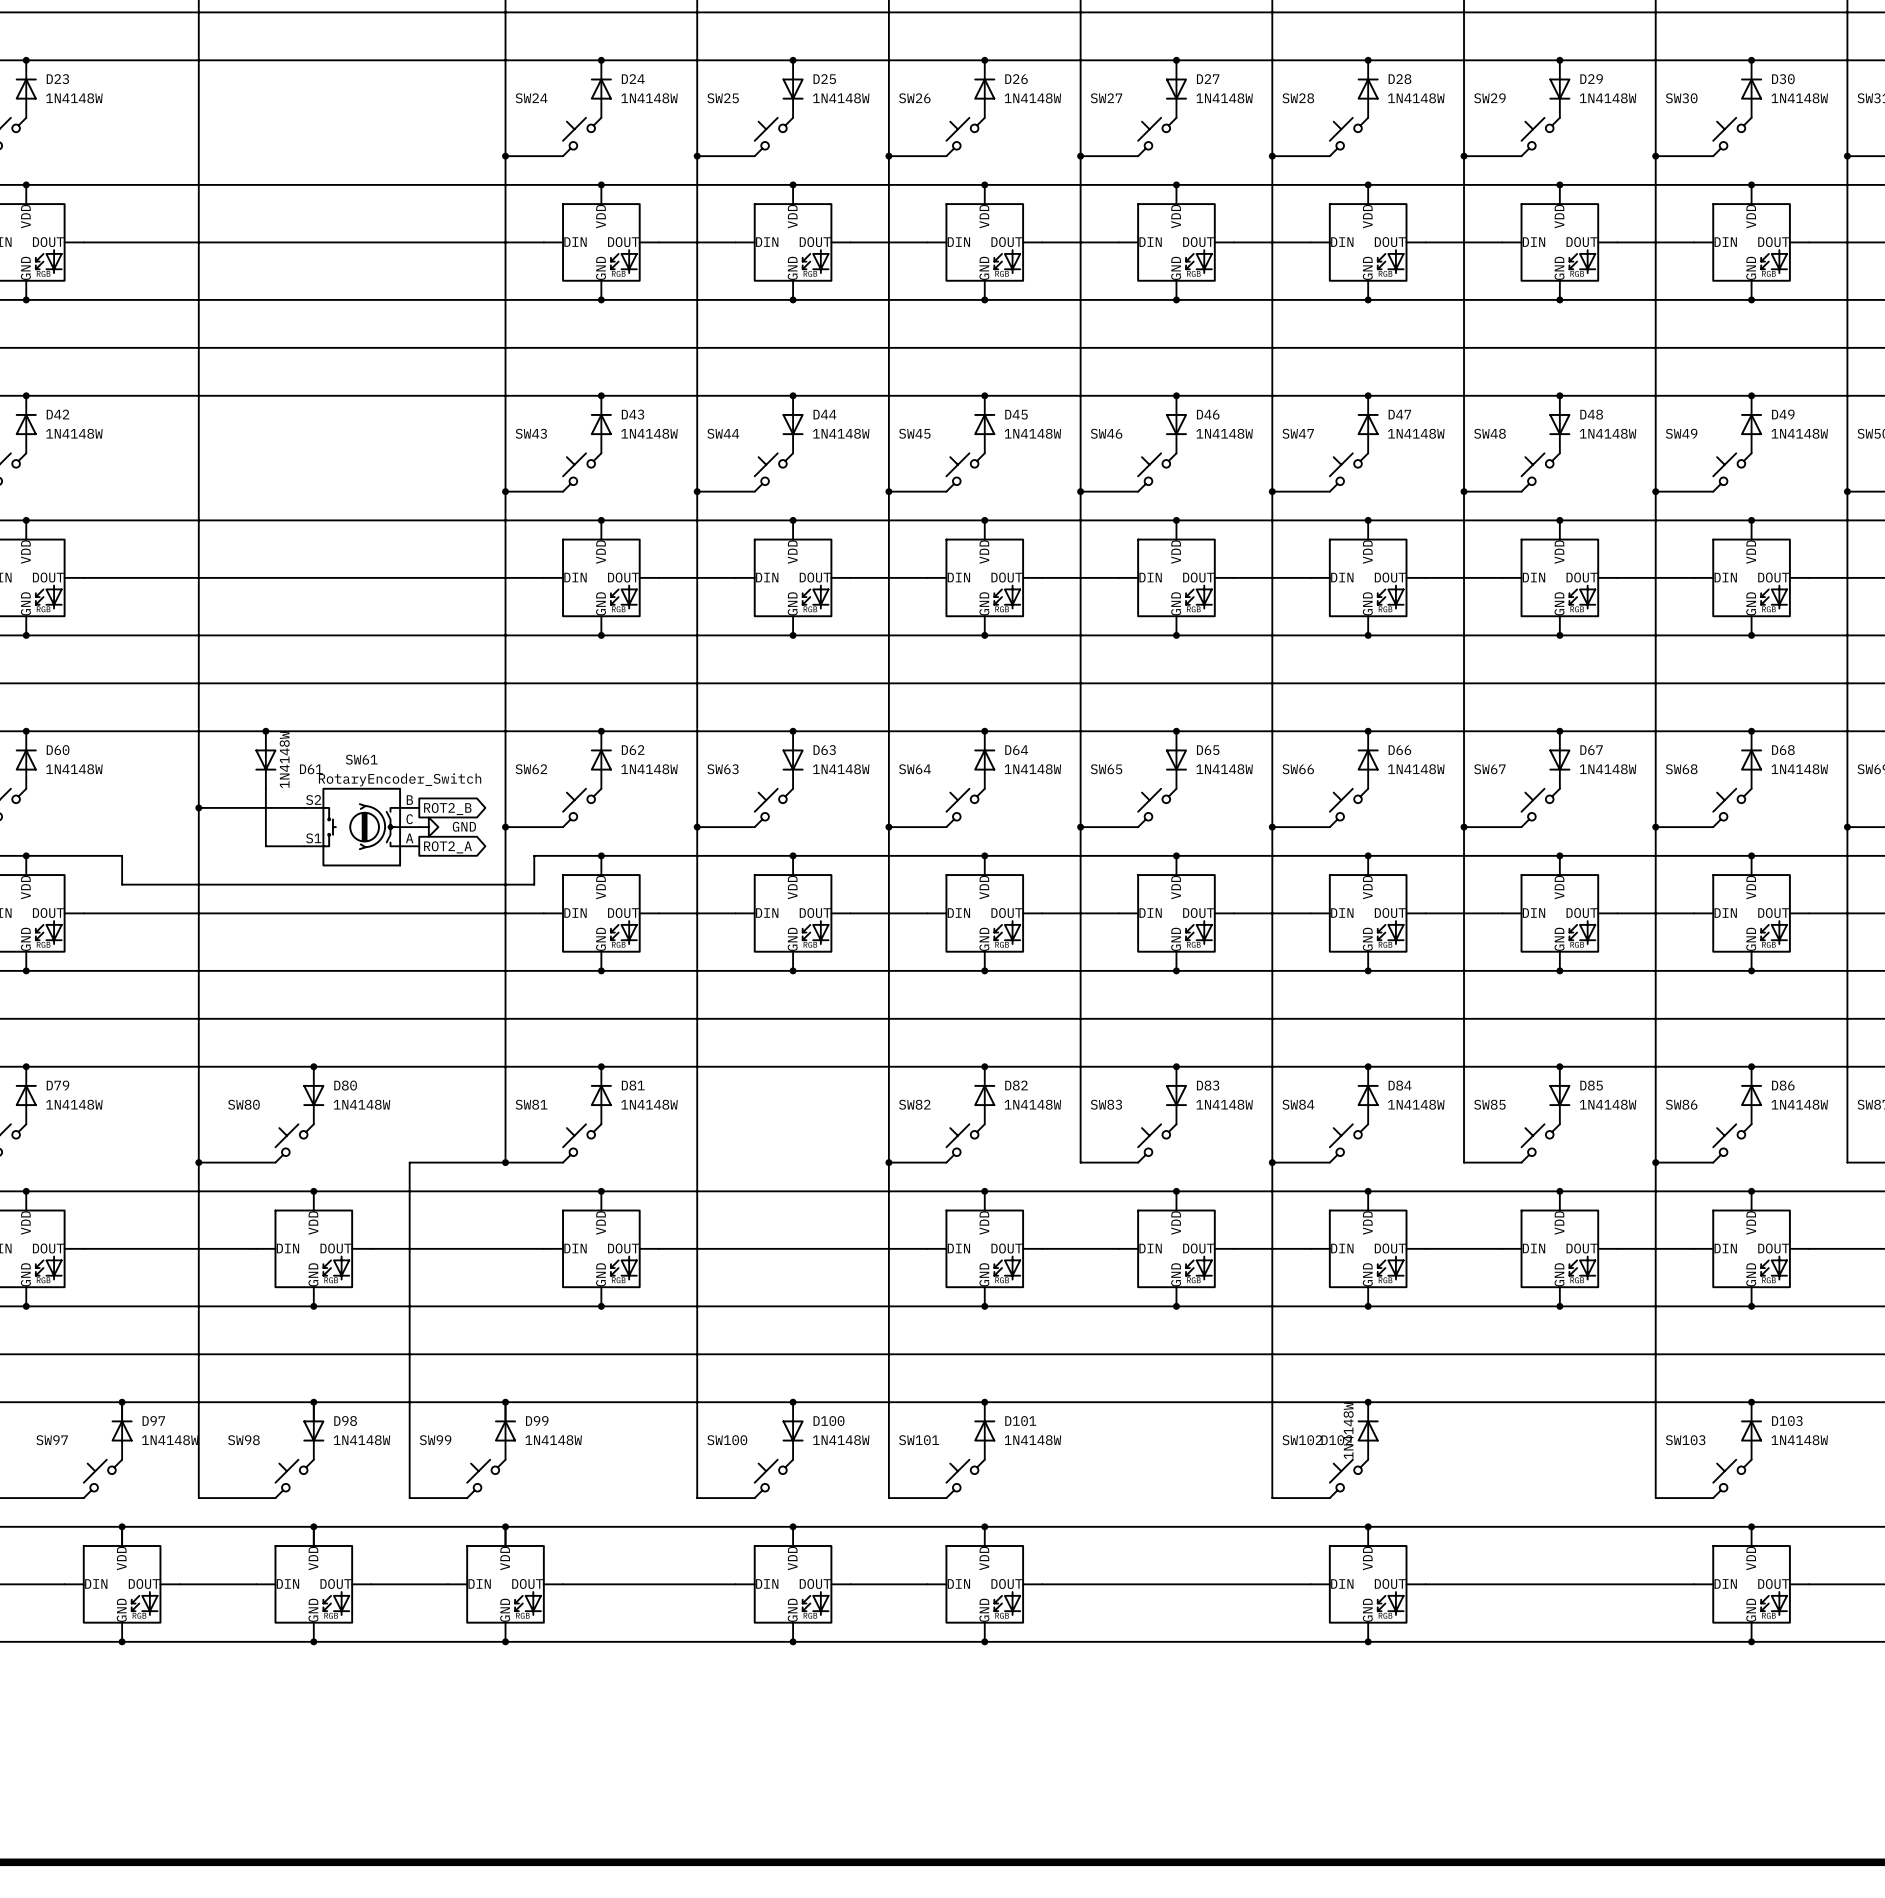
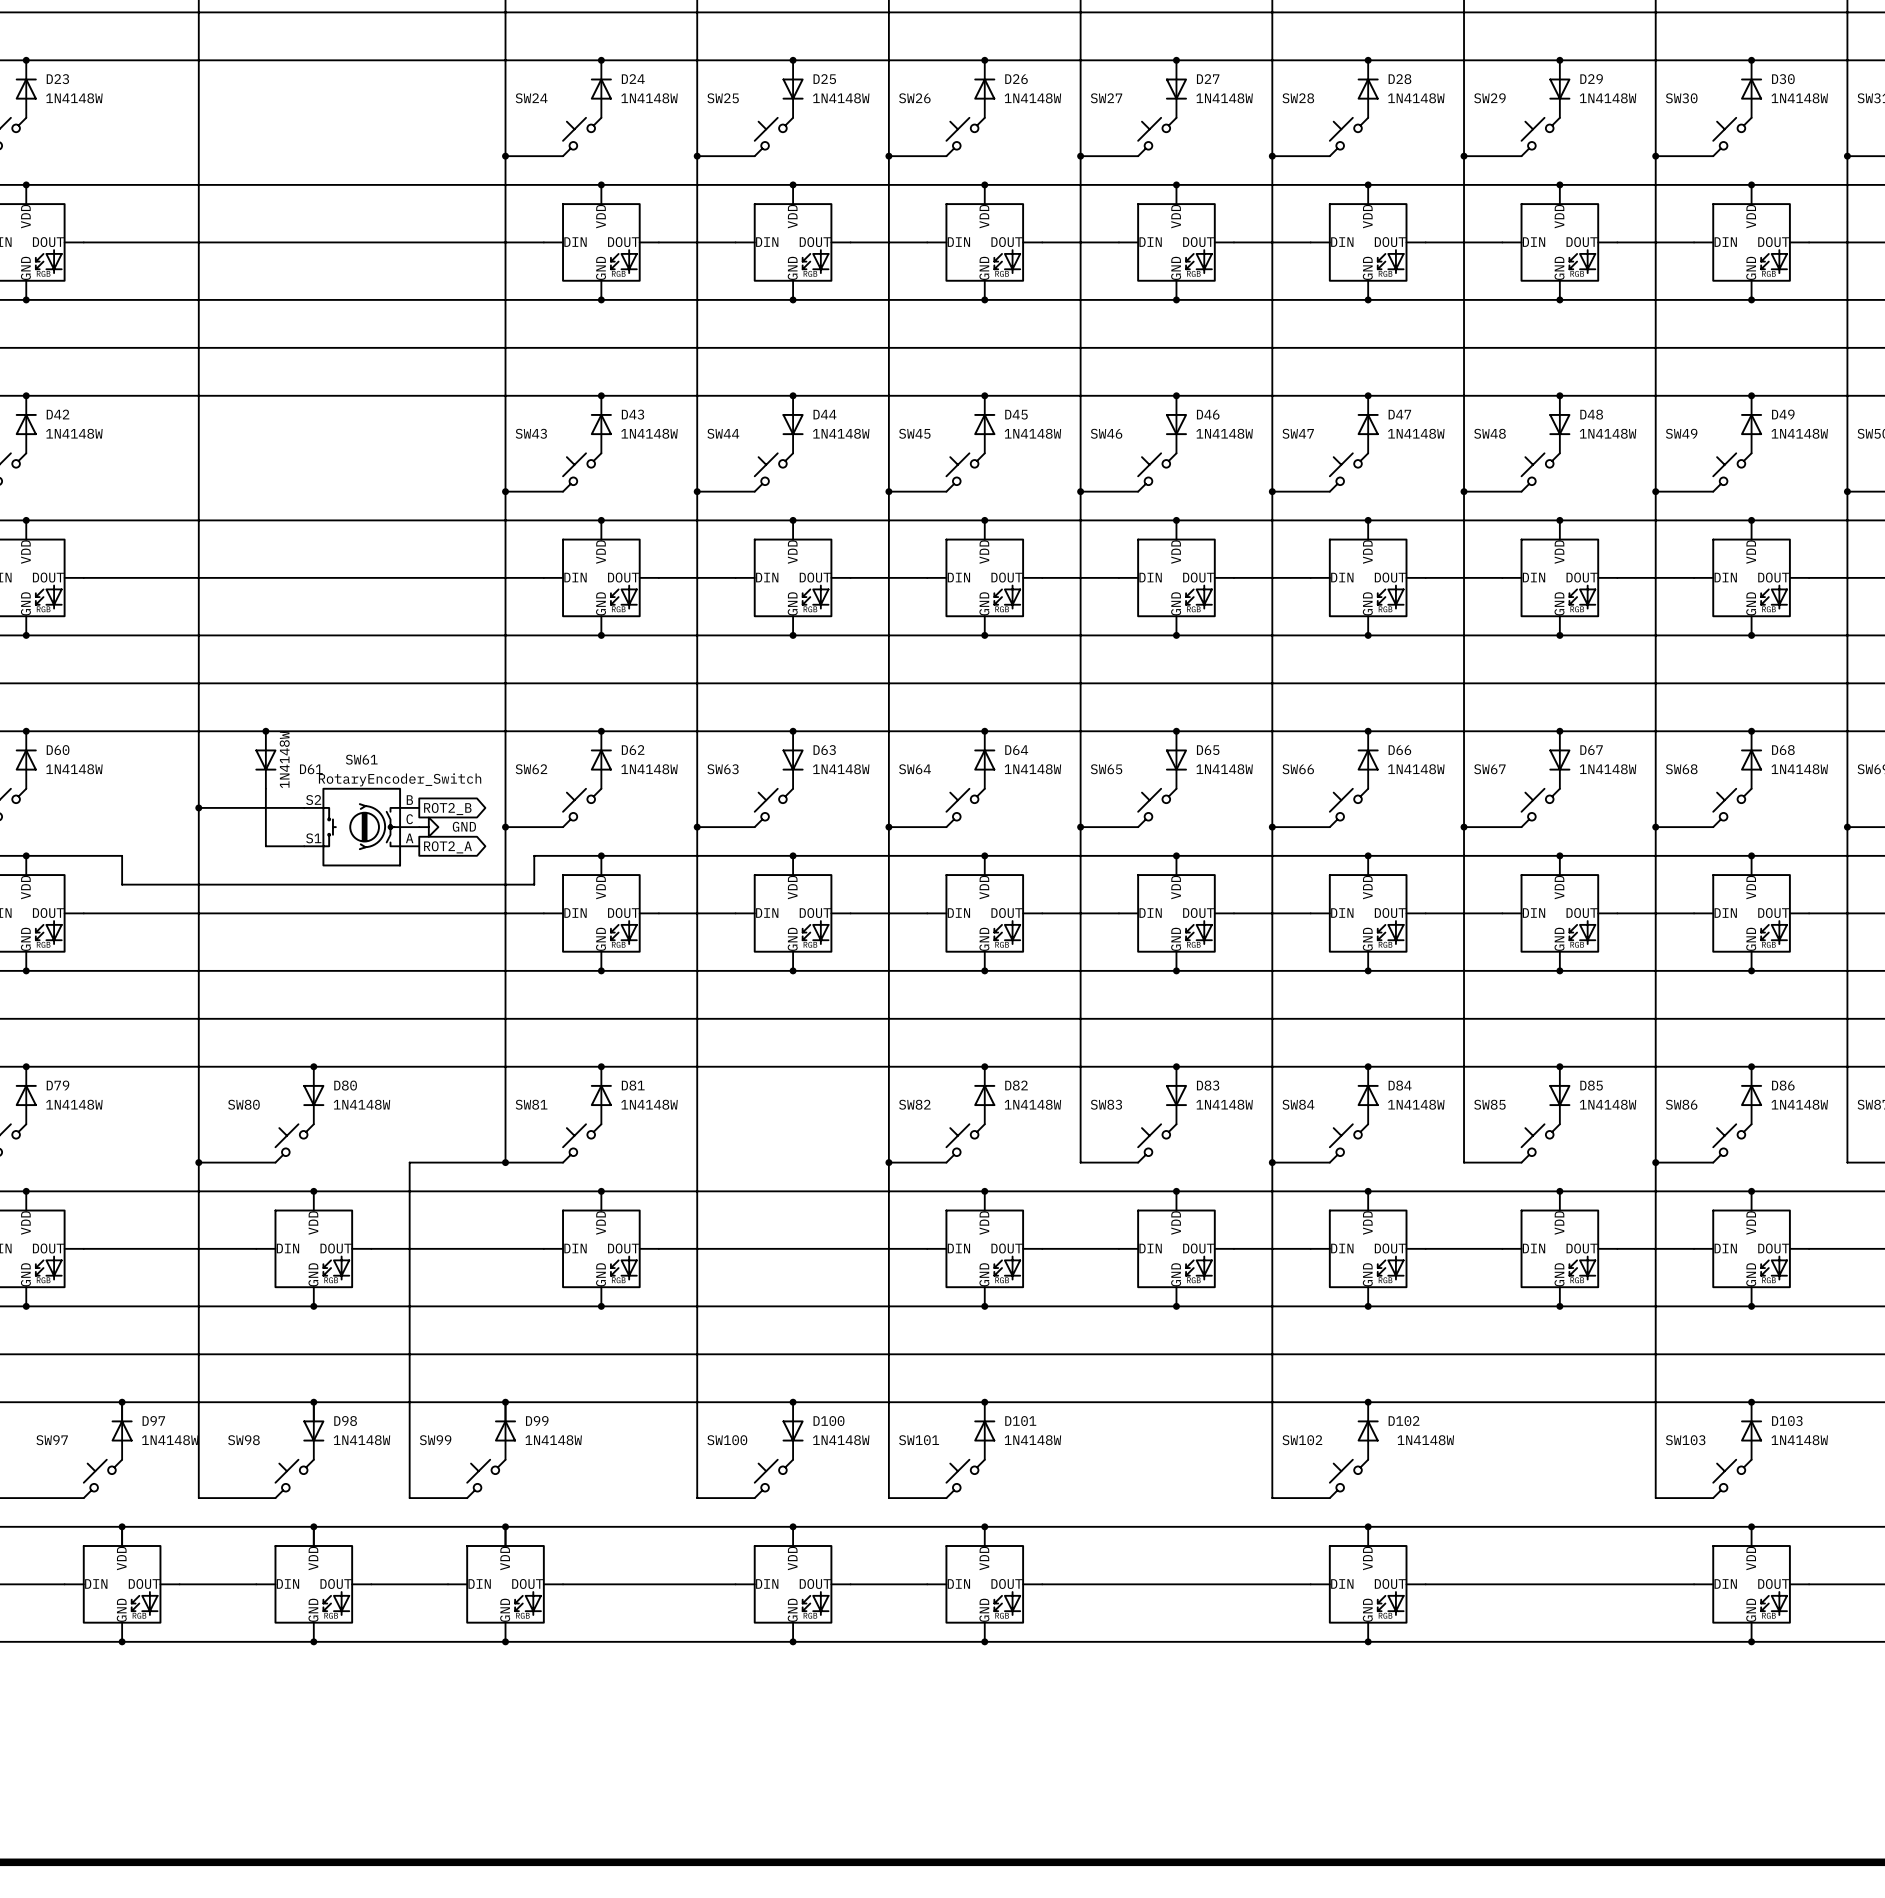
D102 value rotation: 0° (1348, 1430) -> 90° clockwise (1425, 1440)
D102 value position: 1N4148W (1348, 1430) -> 1N4148W (1425, 1440)
D102 name position: D102 (1336, 1440) -> D102 (1404, 1421)

